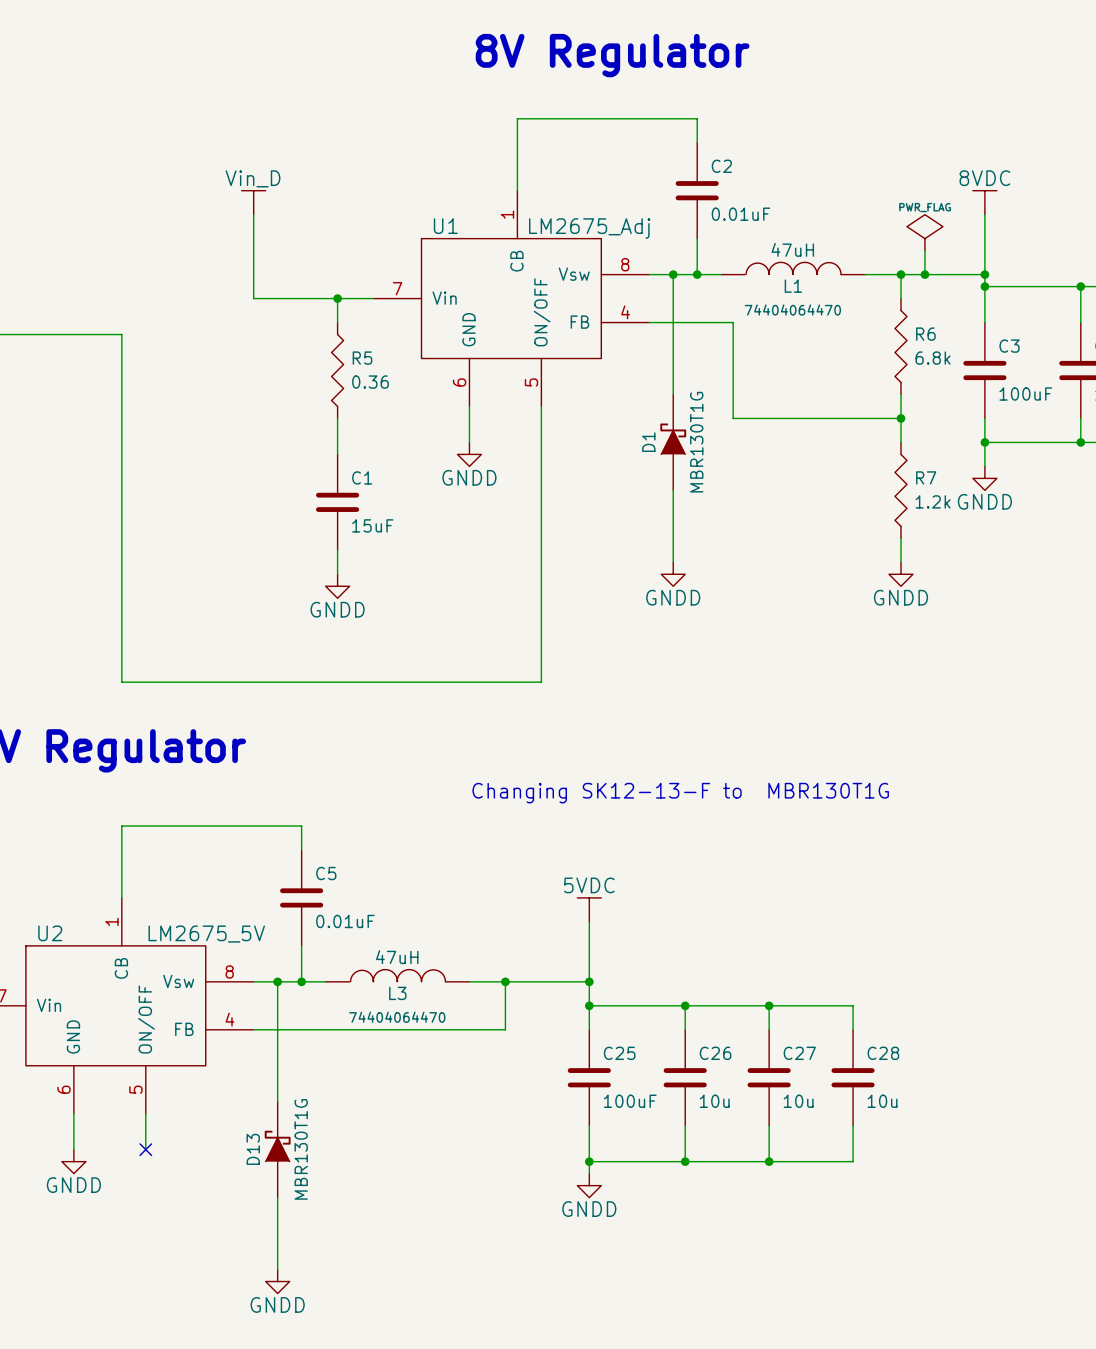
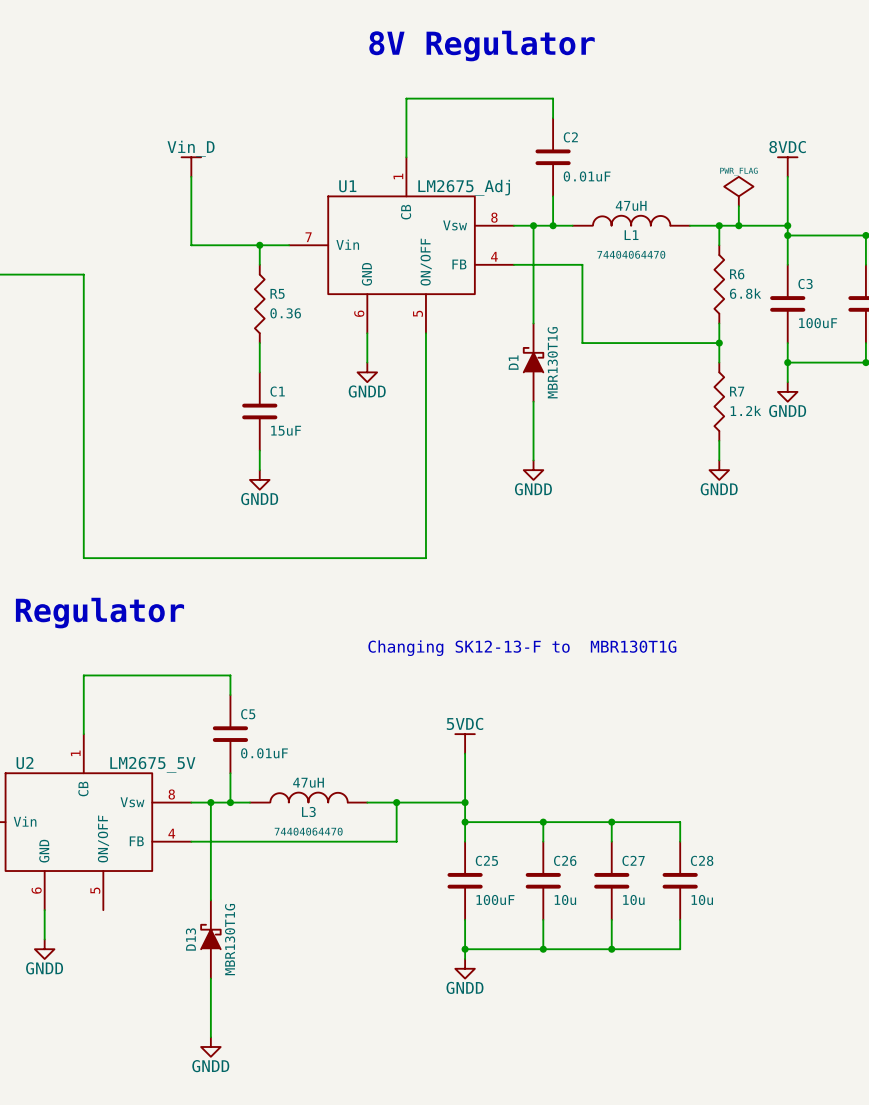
wire: (145, 1113) (145, 1149) -> none
no-connect mark: (145, 1149) -> none

